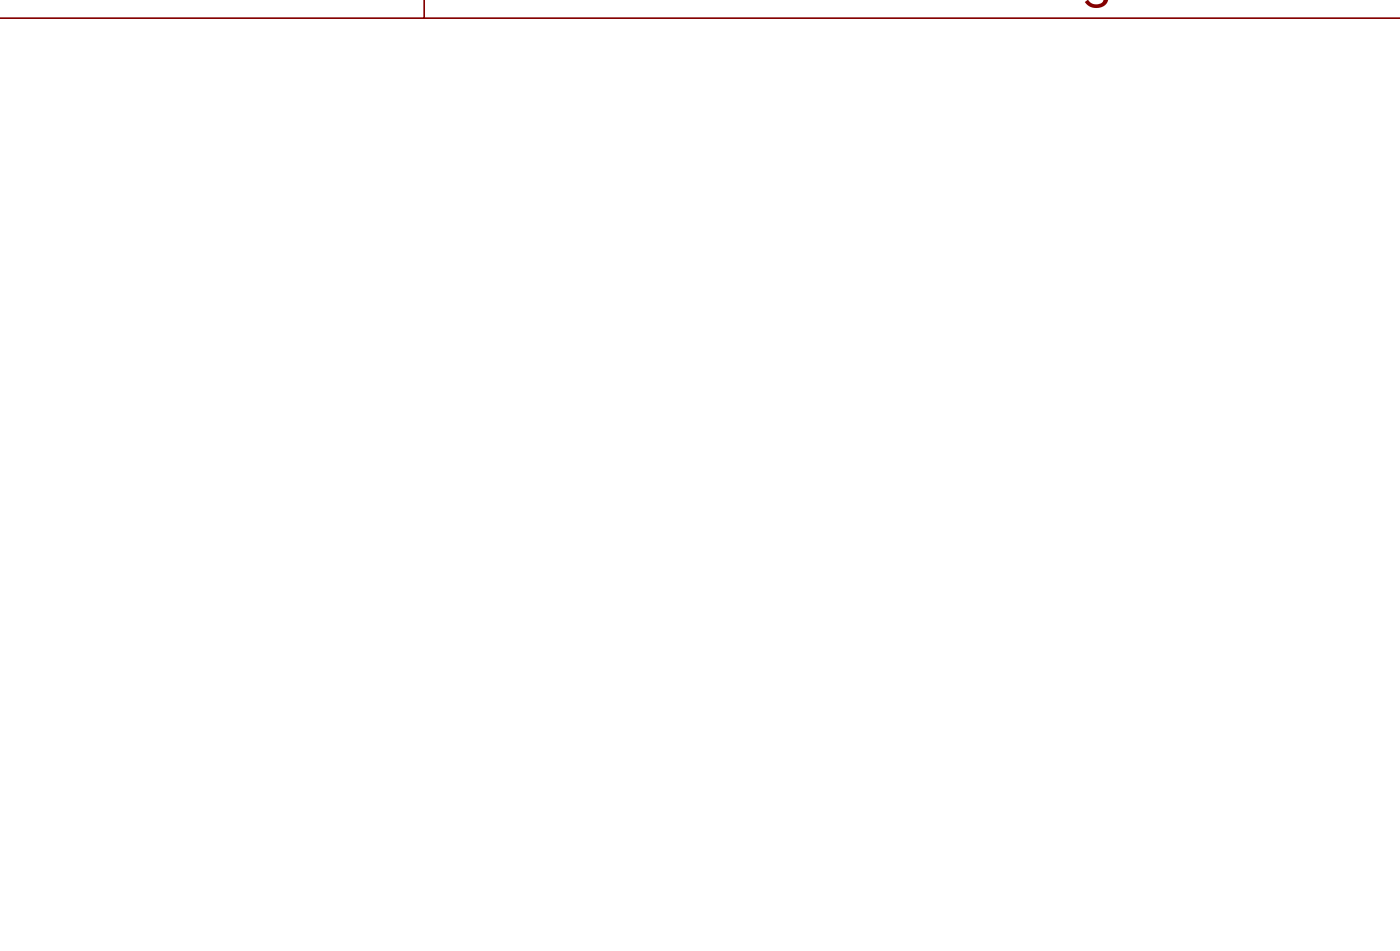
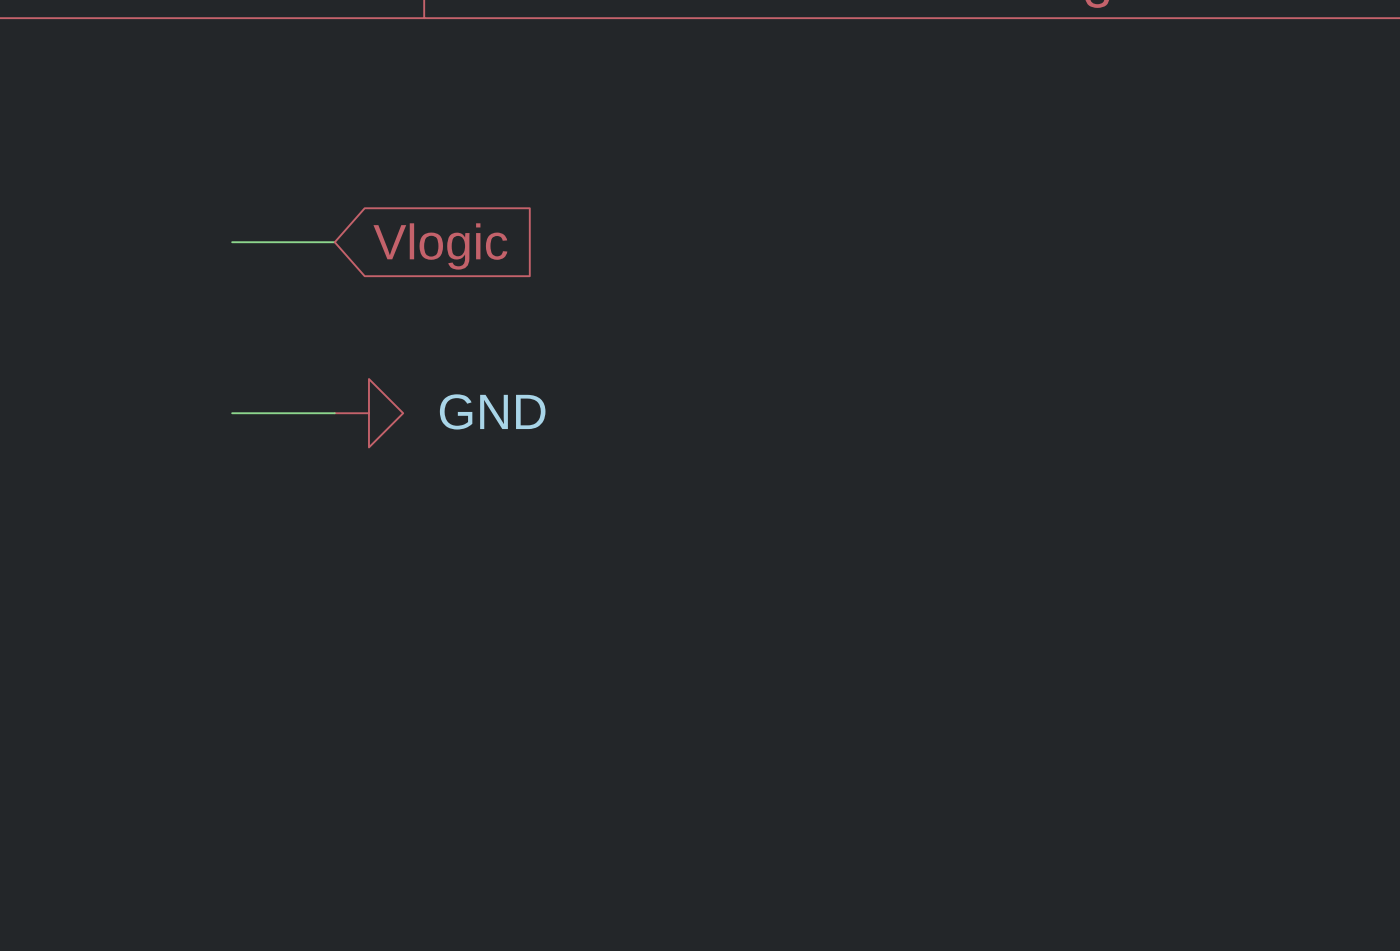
wire: none -> (232, 242) (334, 242)
global label: none -> Vlogic (440, 246)
wire: none -> (232, 413) (334, 413)
power symbol: none -> GND (368, 413)

